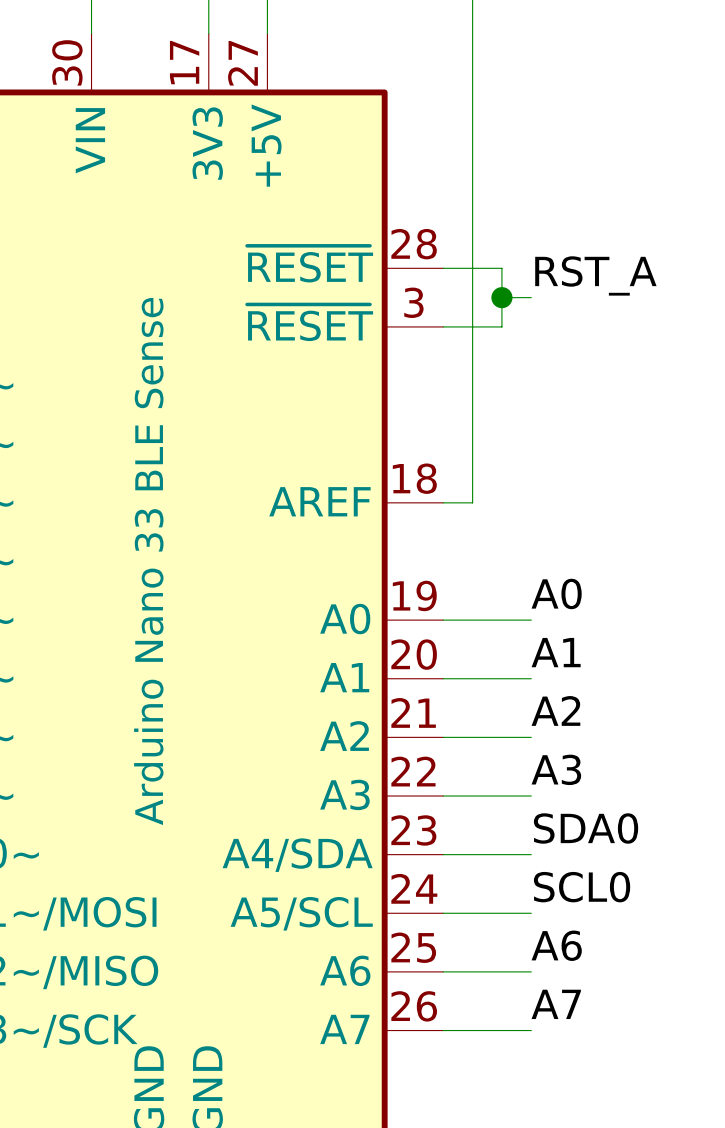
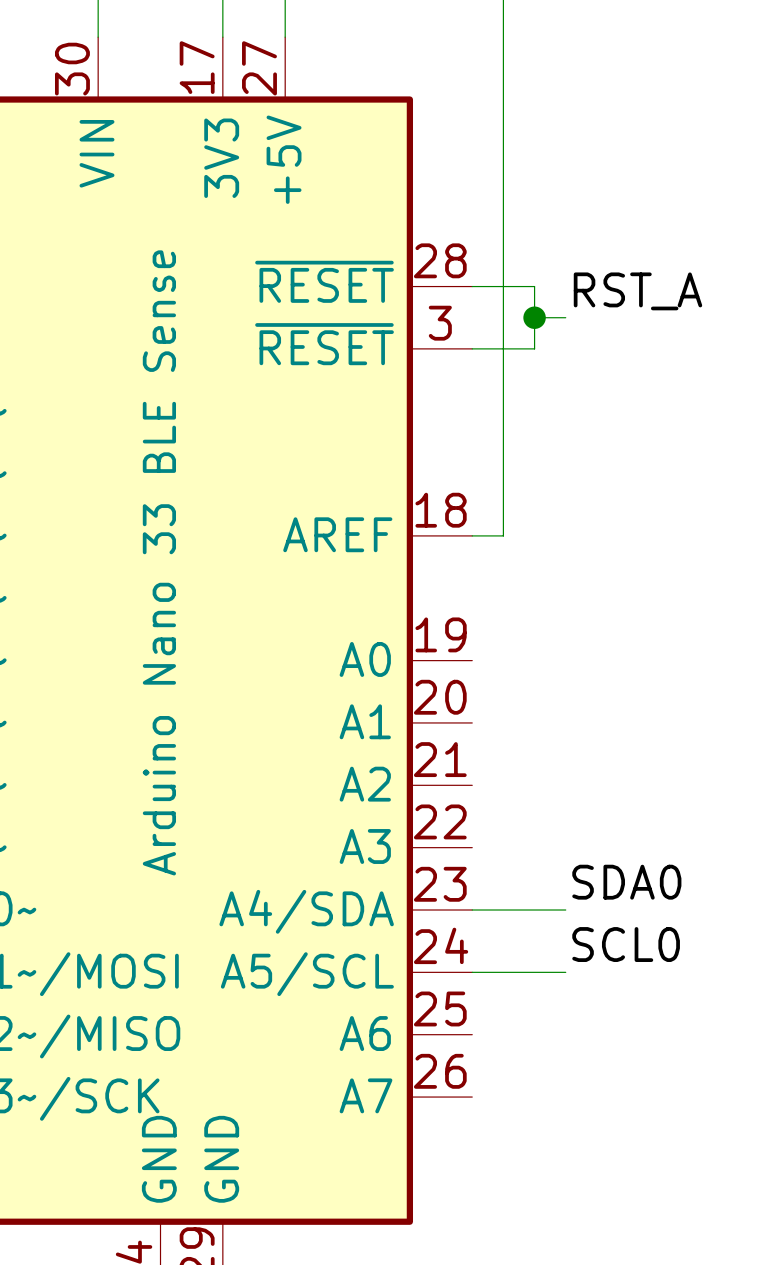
label: A0 (556, 593) -> none
wire: (443, 620) (531, 620) -> none
label: A1 (556, 652) -> none
wire: (443, 678) (531, 678) -> none
label: A2 (555, 710) -> none
wire: (443, 737) (531, 737) -> none
label: A3 (556, 769) -> none
wire: (443, 796) (531, 796) -> none
label: A6 (556, 945) -> none
wire: (443, 971) (531, 971) -> none
label: A7 (556, 1004) -> none
wire: (443, 1030) (531, 1030) -> none

